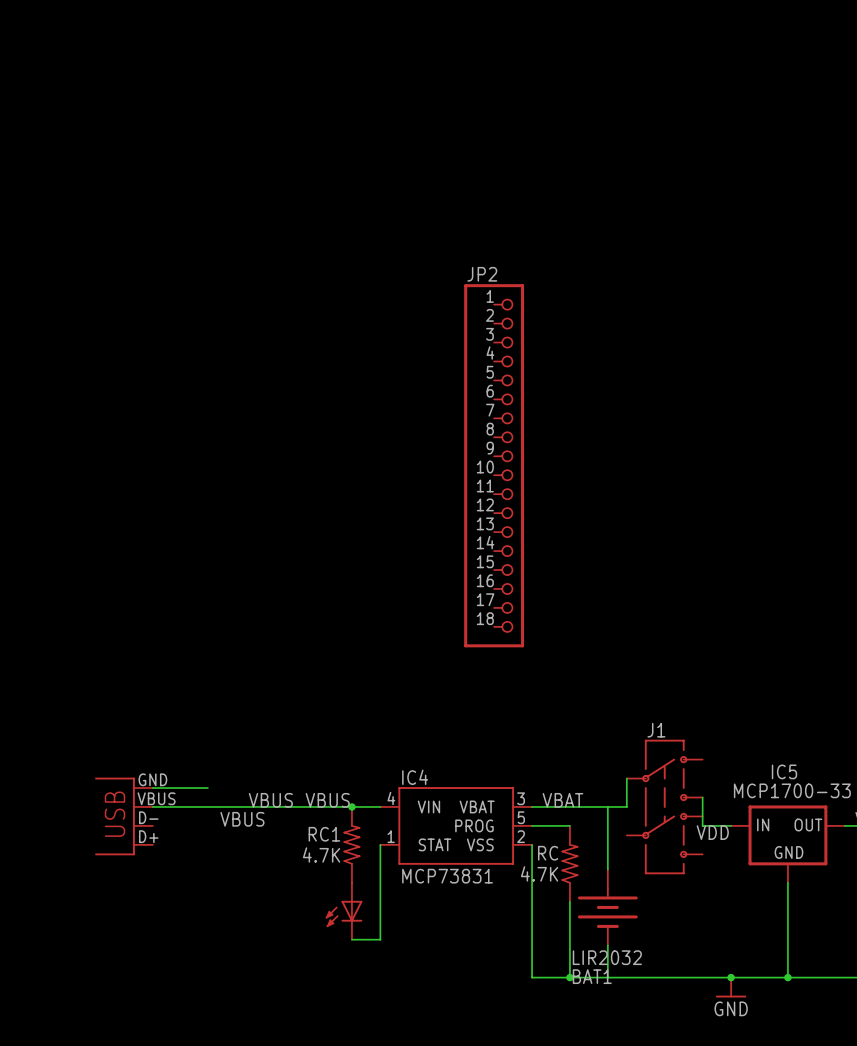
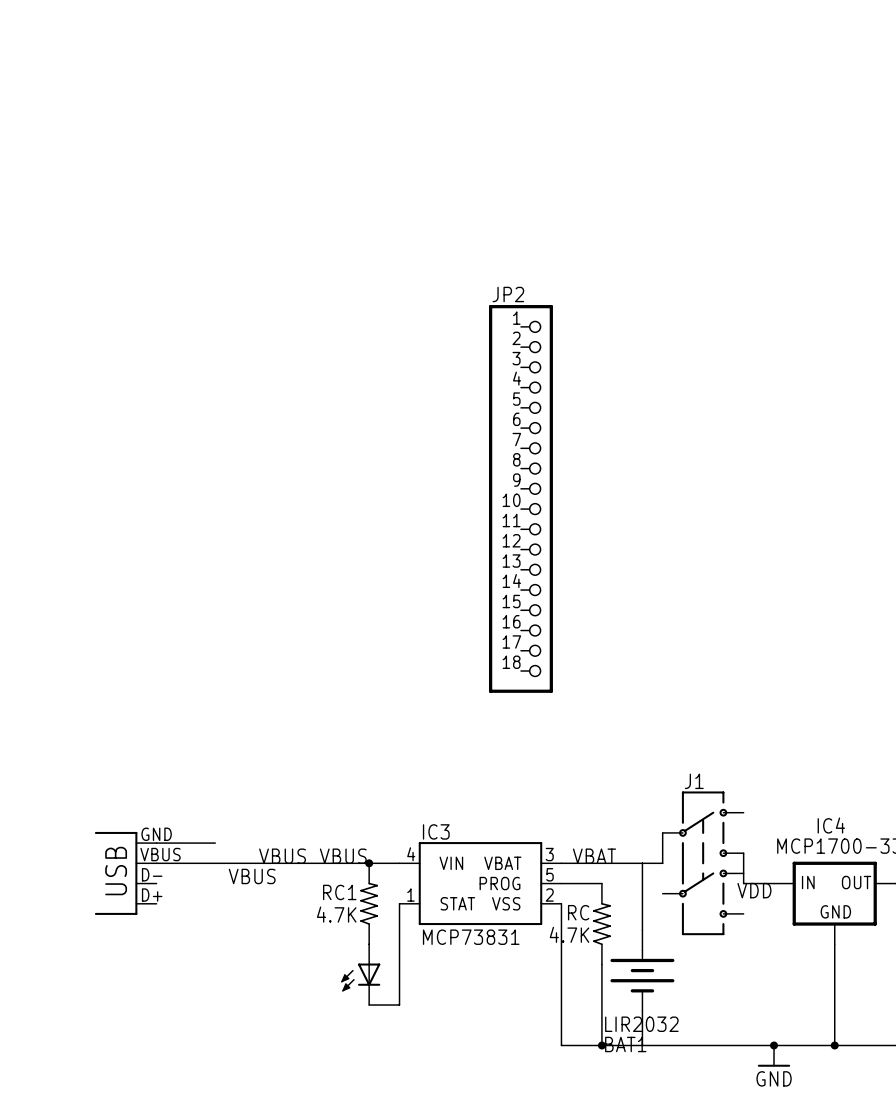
IC5 name: IC5 (784, 771) -> IC4 (831, 825)
IC4 name: IC4 (415, 777) -> IC3 (436, 831)

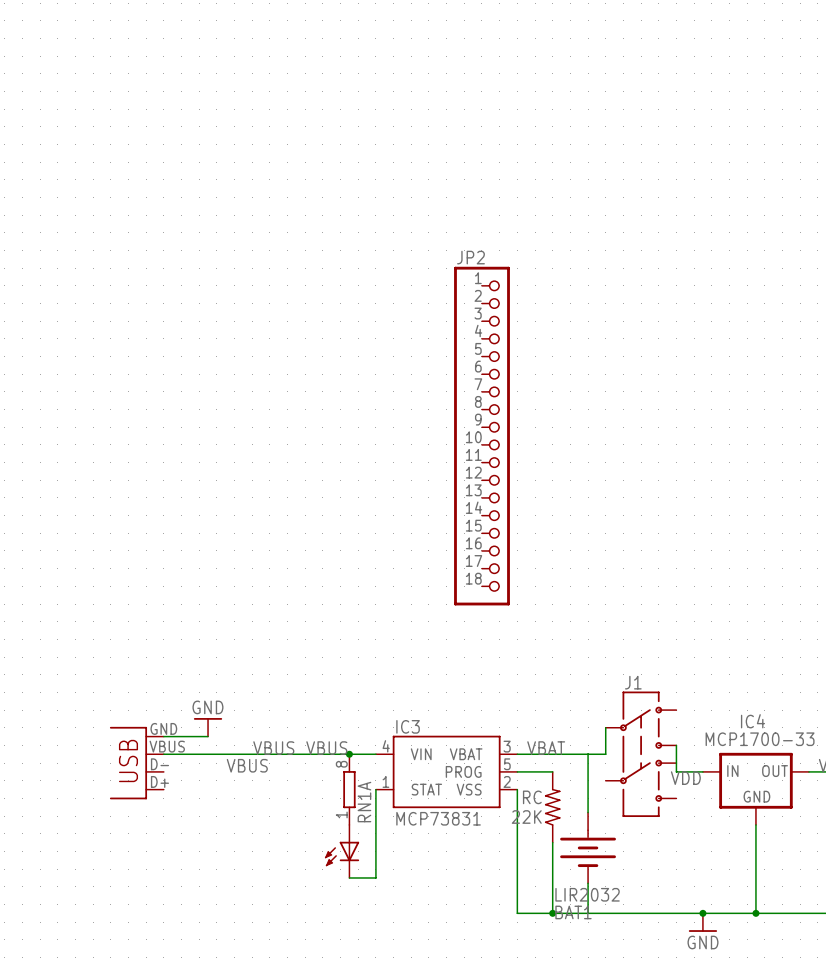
power symbol: none -> GND (208, 727)
wire: (207, 843) (215, 843) -> none
RC1: 4.7K (369, 903) -> none
RN1A: none -> (349, 789)
RC value: 4.7K (569, 934) -> 22K (526, 817)

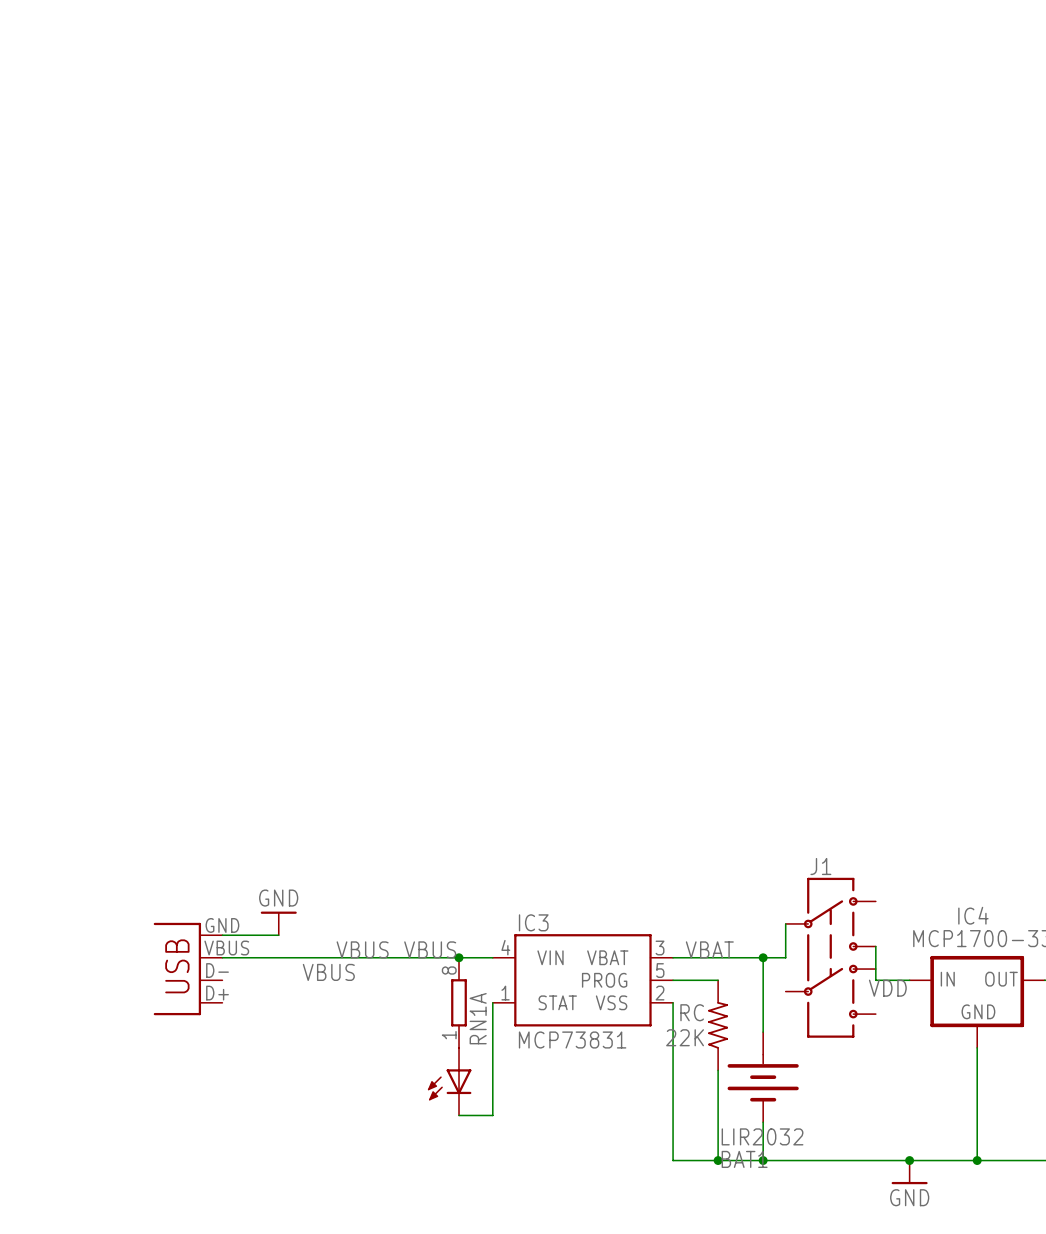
JP2: (481, 436) -> none
junction: none -> (763, 957)
junction: none -> (763, 1160)

